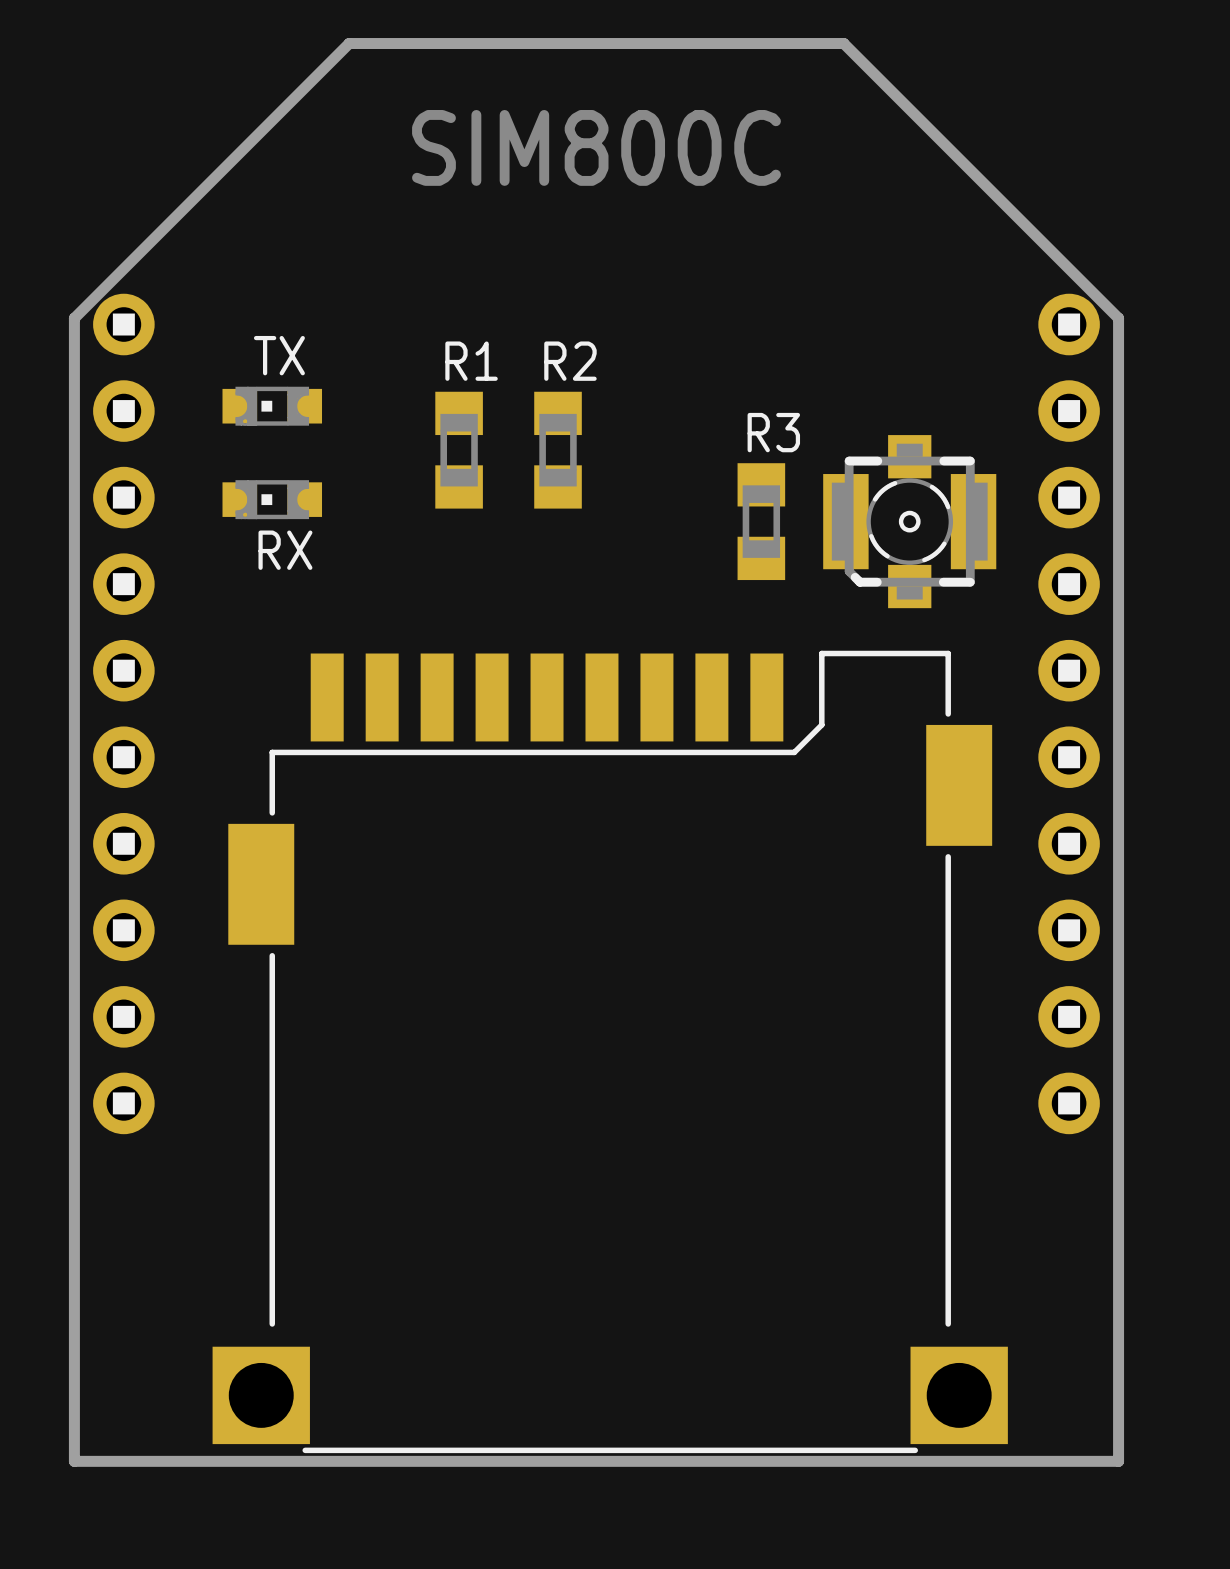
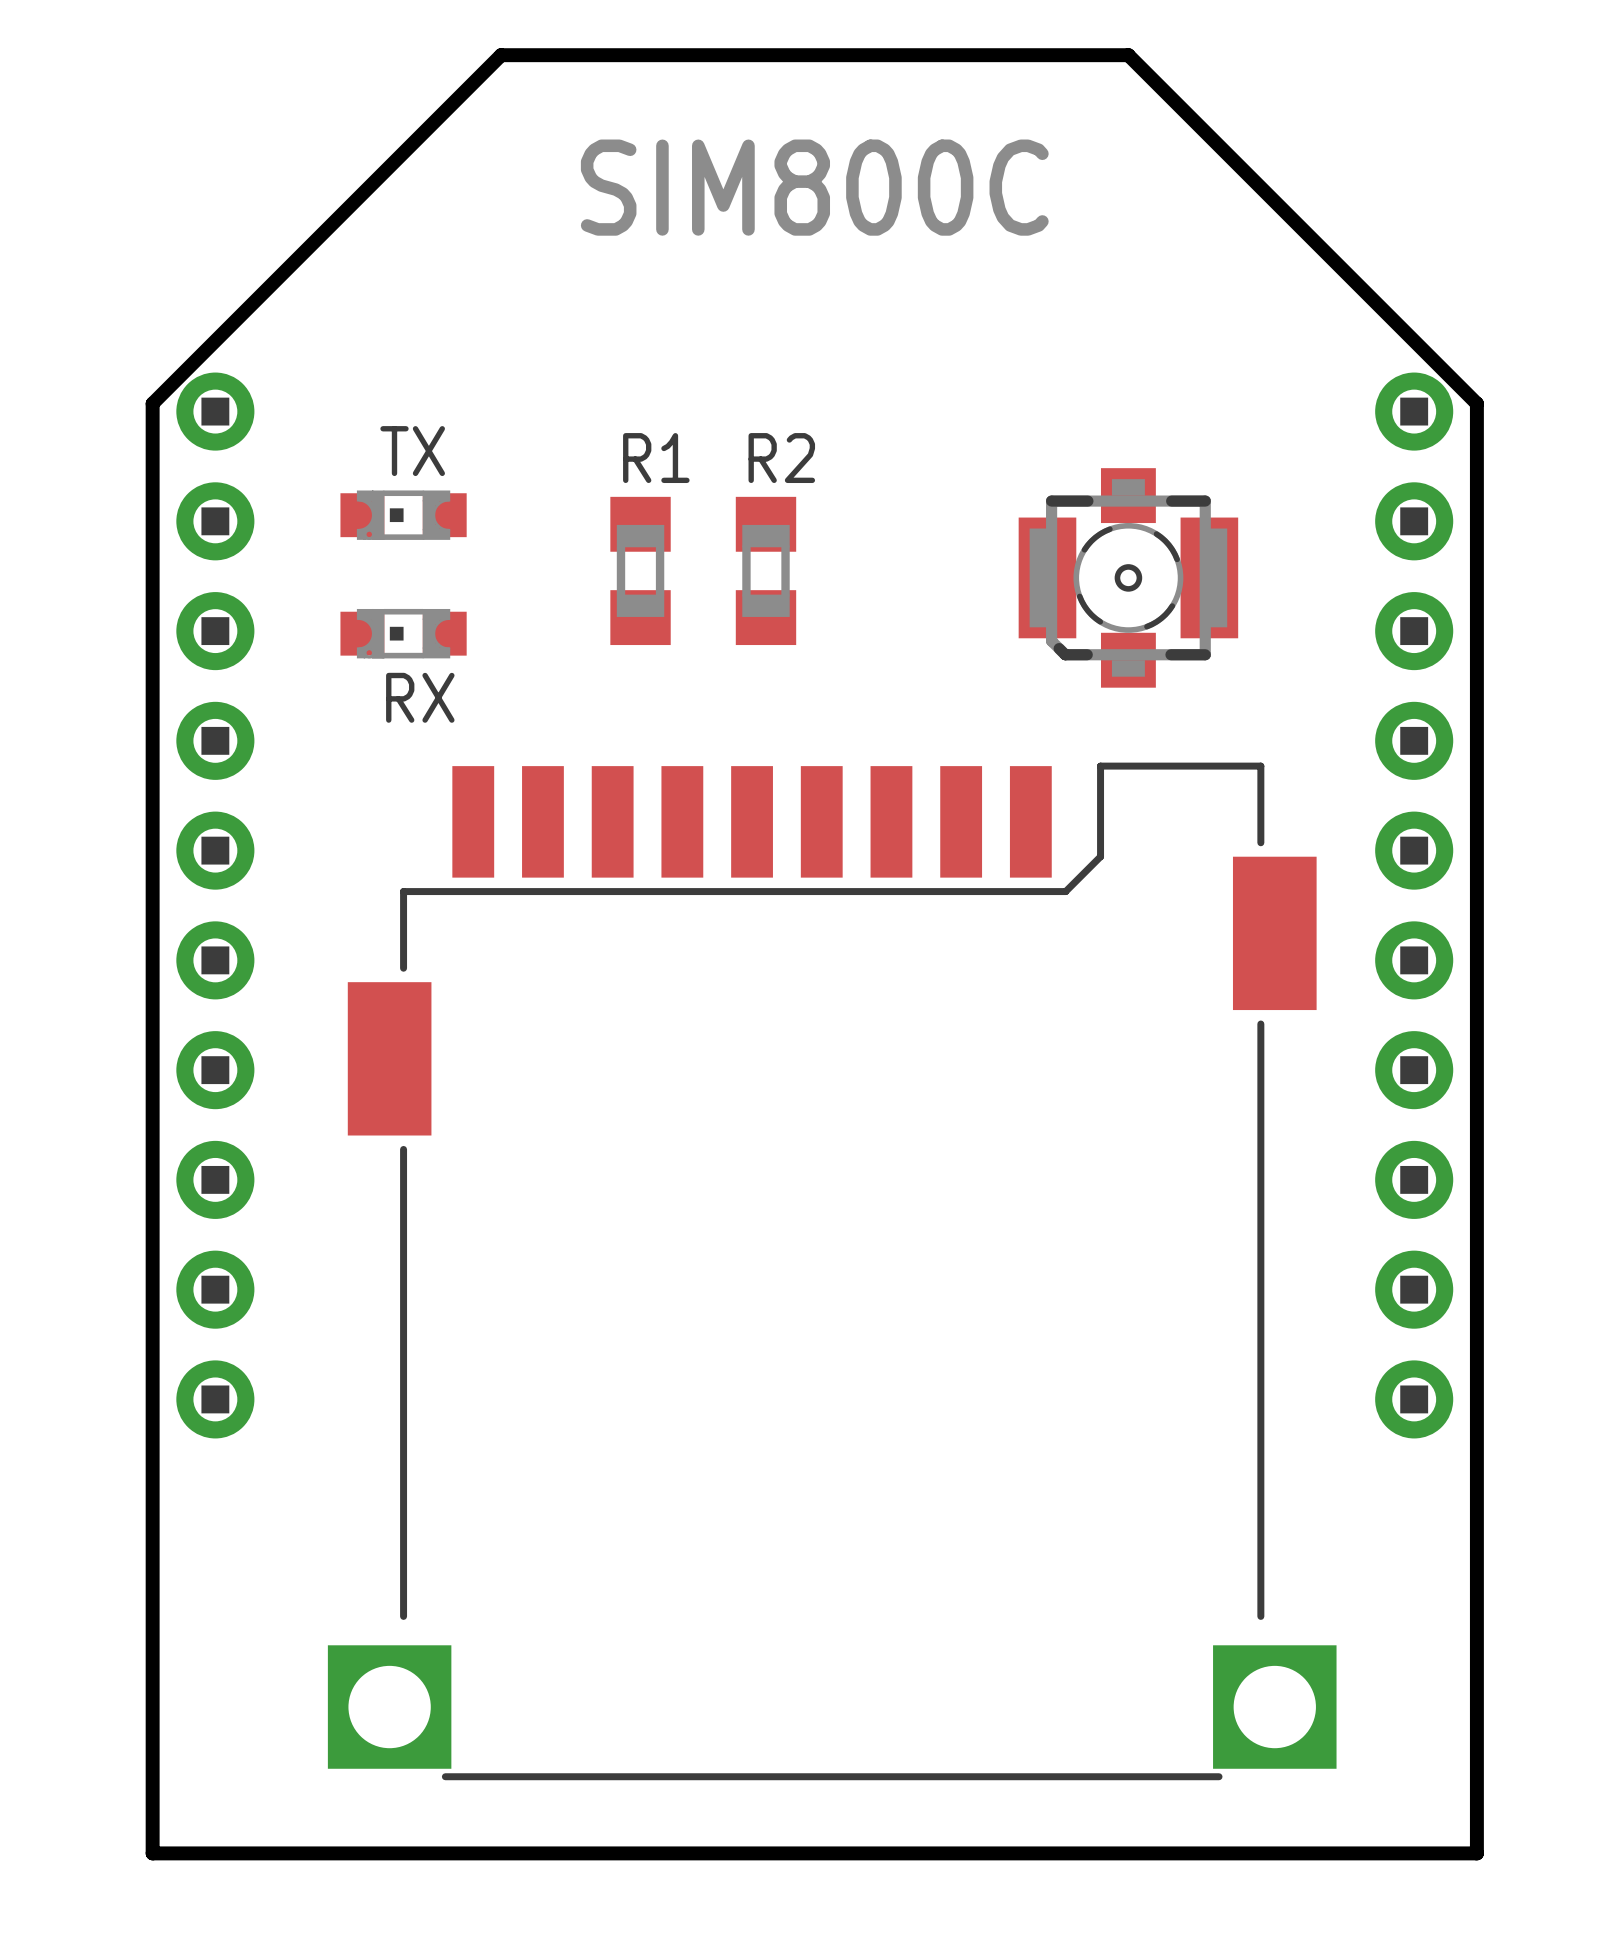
R3: (761, 521) -> none
part position: (909, 521) -> (1128, 577)
part position: (610, 1051) -> (832, 1271)

